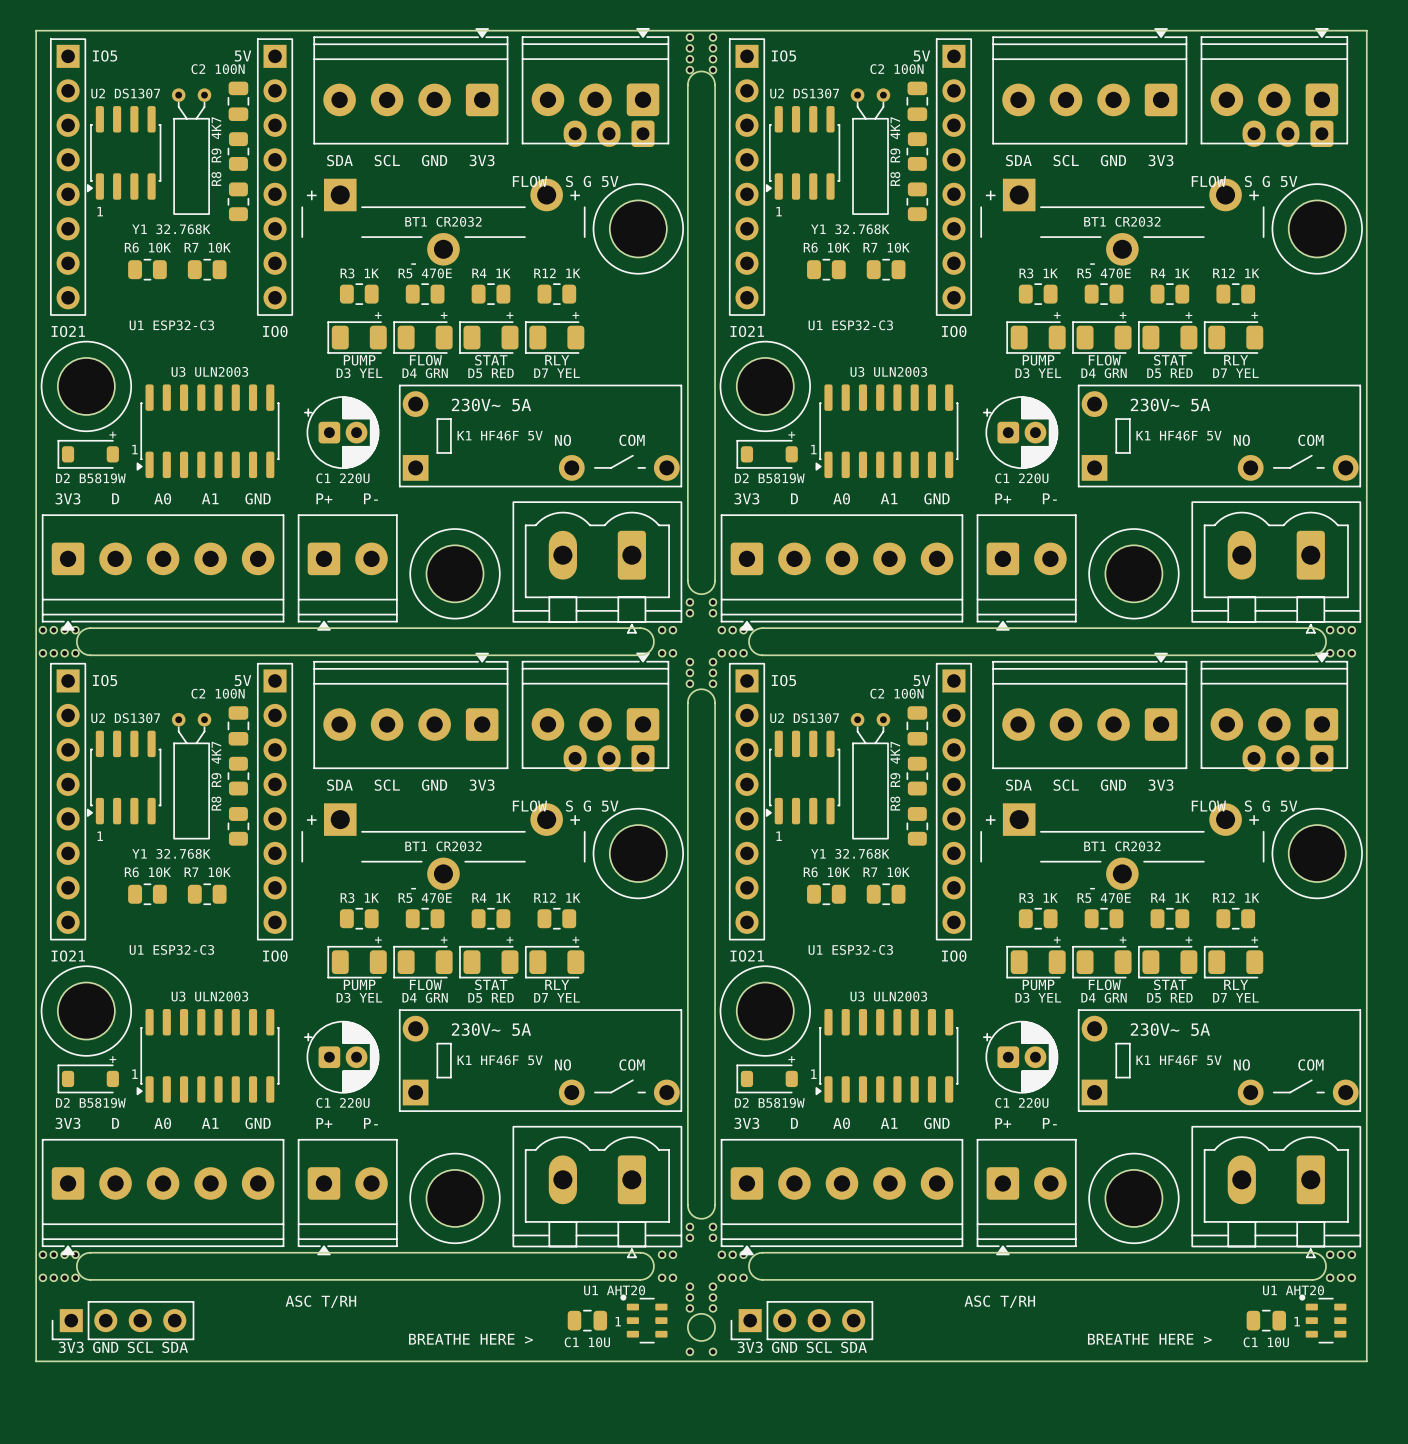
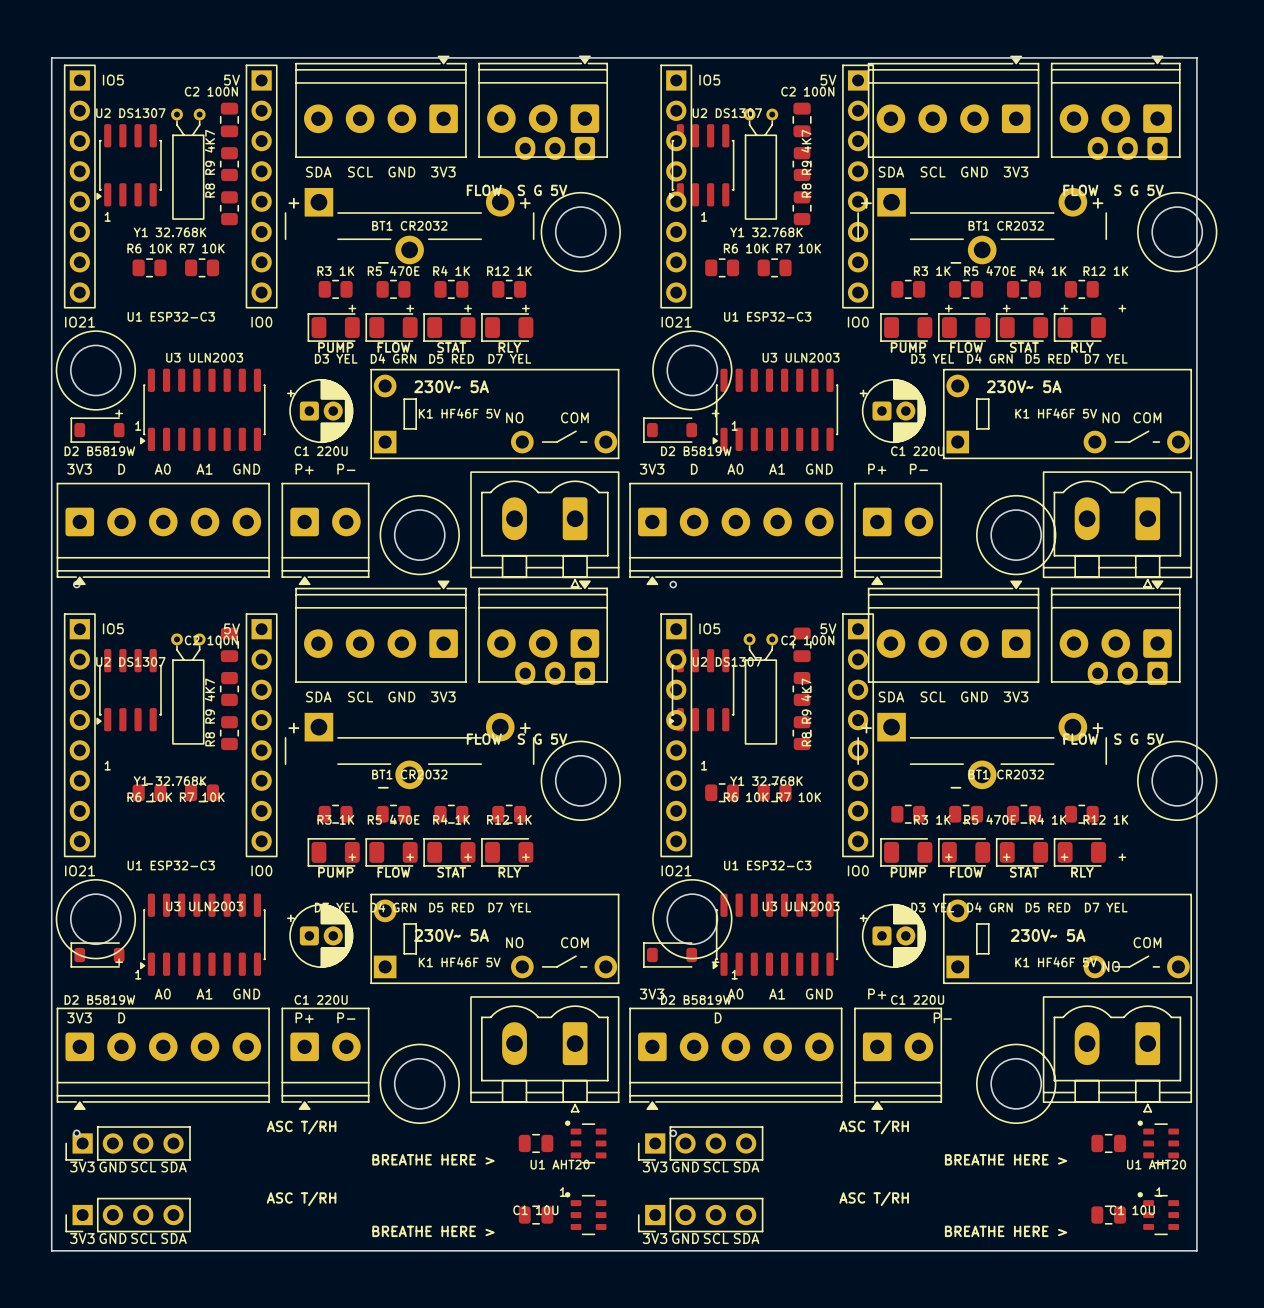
board edge: (1339, 30) (1366, 30) (1366, 1361) (36, 1361) -> (1196, 57) (1196, 1250) (51, 1250) (51, 1226)
part: (689, 37) -> none
part: (713, 37) -> none
part: (689, 48) -> none
part: (713, 48) -> none
part: (689, 59) -> none
part: (713, 59) -> none
part: (689, 70) -> none
part: (713, 70) -> none
board edge: (687, 85) (687, 580) (691, 590) (701, 594) (711, 590) (715, 580) (715, 85) (711, 75) (701, 71) (691, 75) (687, 85) -> none
part position: (1089, 86) -> (953, 106)
part position: (1274, 87) -> (1115, 107)
part position: (917, 101) -> (802, 119)
part position: (870, 151) -> (760, 164)
part position: (917, 151) -> (802, 164)
part position: (803, 152) -> (701, 165)
text position: SDA (1018, 160) -> SDA (891, 172)
text position: SCL (1066, 160) -> SCL (933, 172)
text position: GND (1113, 160) -> GND (974, 172)
text position: 3V3 (1161, 160) -> 3V3 (1015, 172)
part position: (917, 201) -> (802, 208)
part position: (1122, 222) -> (982, 226)
part: none -> (722, 267)
part: (826, 269) -> none
part: none -> (774, 267)
part: (886, 269) -> none
part: none -> (908, 289)
part: (1038, 294) -> none
part: none -> (966, 289)
part: (1104, 294) -> none
part: none -> (1023, 289)
part: (1169, 294) -> none
part: none -> (1081, 289)
part: (1235, 294) -> none
part: none -> (906, 327)
part: (1036, 337) -> none
part: none -> (964, 327)
part: (1101, 337) -> none
part: none -> (1022, 327)
part: (1167, 337) -> none
part: none -> (1079, 327)
part: (1233, 337) -> none
text position: PUMP (1038, 360) -> PUMP (908, 347)
text position: FLOW (1104, 360) -> FLOW (966, 347)
text position: STAT (1170, 360) -> STAT (1024, 347)
text position: RLY (1236, 360) -> RLY (1082, 347)
text position: 230V~ 5A (1170, 405) -> 230V~ 5A (1024, 386)
part position: (886, 431) -> (775, 409)
part position: (1020, 432) -> (892, 411)
part position: (1219, 436) -> (1067, 414)
text position: COM (1310, 440) -> COM (1147, 417)
part position: (767, 454) -> (670, 430)
text position: 3V3 (746, 498) -> 3V3 (652, 469)
text position: D (794, 498) -> D (694, 469)
text position: A0 (841, 498) -> A0 (735, 469)
text position: A1 (889, 498) -> A1 (777, 469)
text position: GND (936, 498) -> GND (819, 469)
text position: P+ (1003, 498) -> P+ (877, 469)
text position: P- (1049, 498) -> P- (918, 469)
part position: (1276, 567) -> (1117, 529)
part position: (841, 572) -> (735, 533)
part position: (1026, 572) -> (898, 533)
part: (689, 602) -> none
part: (713, 602) -> none
part: (689, 613) -> none
part: (713, 613) -> none
board edge: (90, 628) (640, 628) (649, 632) (653, 641) (649, 651) (640, 655) (90, 655) (80, 651) (76, 641) (80, 632) (90, 628) -> none
board edge: (762, 628) (1312, 628) (1322, 632) (1326, 641) (1322, 651) (1312, 655) (762, 655) (752, 651) (748, 641) (752, 632) (762, 628) -> none
part: (42, 630) -> none
part: (53, 630) -> none
part: (75, 630) -> none
part: (662, 630) -> none
part: (672, 630) -> none
part: (721, 630) -> none
part: (732, 630) -> none
part: (1330, 630) -> none
part: (1340, 630) -> none
part: (1351, 630) -> none
part: (42, 653) -> none
part: (53, 653) -> none
part: (64, 653) -> none
part: (75, 653) -> none
part: (662, 653) -> none
part: (672, 653) -> none
part: (721, 653) -> none
part: (732, 653) -> none
part: (743, 653) -> none
part: (1330, 653) -> none
part: (1340, 653) -> none
part: (1351, 653) -> none
part: (689, 662) -> none
part: (713, 662) -> none
part: (689, 672) -> none
part: (713, 672) -> none
part: (689, 683) -> none
part: (713, 683) -> none
board edge: (687, 702) (687, 1205) (691, 1214) (701, 1218) (711, 1214) (715, 1205) (715, 702) (711, 693) (701, 689) (691, 693) (687, 702) -> none
part position: (410, 710) -> (380, 631)
part position: (1089, 710) -> (953, 631)
part position: (595, 712) -> (543, 632)
part position: (1274, 712) -> (1115, 632)
part position: (238, 725) -> (229, 644)
part position: (917, 725) -> (802, 644)
part: none -> (229, 688)
part: none -> (802, 688)
part position: (191, 776) -> (188, 689)
part: (238, 776) -> none
part position: (870, 776) -> (760, 689)
part: (917, 776) -> none
part position: (124, 777) -> (129, 690)
part position: (803, 777) -> (701, 690)
text position: SDA (339, 785) -> SDA (318, 696)
text position: SCL (387, 785) -> SCL (360, 696)
text position: GND (434, 785) -> GND (401, 696)
text position: 3V3 (482, 785) -> 3V3 (443, 696)
text position: SDA (1018, 785) -> SDA (891, 696)
text position: SCL (1066, 785) -> SCL (933, 696)
text position: GND (1113, 785) -> GND (974, 696)
text position: 3V3 (1161, 785) -> 3V3 (1015, 696)
part: none -> (229, 733)
part: none -> (802, 733)
part: (238, 826) -> none
part: (917, 826) -> none
part position: (443, 846) -> (409, 751)
part position: (1122, 846) -> (982, 751)
part: none -> (202, 792)
part: none -> (722, 792)
part: none -> (774, 792)
part: none -> (908, 814)
part: none -> (966, 814)
part: none -> (1023, 814)
part: none -> (1081, 814)
part position: (147, 894) -> (149, 792)
part: (207, 894) -> none
part: (826, 894) -> none
part: (886, 894) -> none
part position: (359, 918) -> (335, 814)
part position: (425, 918) -> (393, 814)
part position: (490, 918) -> (451, 814)
part position: (556, 918) -> (509, 814)
part: (1038, 918) -> none
part: (1104, 918) -> none
part: (1169, 918) -> none
part: (1235, 918) -> none
part: none -> (906, 852)
part: none -> (964, 852)
part: none -> (1022, 852)
part: none -> (1079, 852)
part position: (357, 962) -> (333, 852)
part position: (422, 962) -> (391, 852)
part position: (488, 962) -> (449, 852)
part position: (554, 962) -> (507, 852)
part: (1036, 962) -> none
part: (1101, 962) -> none
part: (1167, 962) -> none
part: (1233, 962) -> none
text position: PUMP (359, 984) -> PUMP (335, 872)
text position: FLOW (425, 984) -> FLOW (393, 872)
text position: STAT (491, 984) -> STAT (451, 872)
text position: RLY (557, 984) -> RLY (509, 872)
text position: PUMP (1038, 984) -> PUMP (908, 872)
text position: FLOW (1104, 984) -> FLOW (966, 872)
text position: STAT (1170, 984) -> STAT (1024, 872)
text position: RLY (1236, 984) -> RLY (1082, 872)
part position: (208, 1055) -> (202, 934)
part position: (886, 1055) -> (775, 934)
part position: (341, 1057) -> (320, 935)
part position: (1020, 1057) -> (892, 935)
part position: (540, 1060) -> (494, 938)
part position: (1219, 1060) -> (1067, 938)
text position: NO (562, 1064) -> NO (514, 942)
text position: COM (632, 1064) -> COM (574, 942)
text position: COM (1310, 1064) -> COM (1147, 942)
part position: (88, 1078) -> (97, 954)
part position: (767, 1078) -> (670, 954)
text position: A0 (162, 1123) -> A0 (162, 994)
text position: A1 (210, 1123) -> A1 (204, 994)
text position: GND (258, 1123) -> GND (246, 994)
text position: 3V3 (746, 1123) -> 3V3 (652, 994)
text position: A0 (841, 1123) -> A0 (735, 994)
text position: A1 (889, 1123) -> A1 (777, 994)
text position: GND (936, 1123) -> GND (819, 994)
text position: P+ (1003, 1123) -> P+ (877, 994)
part position: (597, 1192) -> (544, 1054)
part position: (1276, 1192) -> (1117, 1054)
part position: (163, 1197) -> (163, 1058)
part position: (347, 1197) -> (325, 1058)
part position: (841, 1197) -> (735, 1058)
part position: (1026, 1197) -> (898, 1058)
part: (689, 1226) -> none
part: (713, 1226) -> none
part: (689, 1237) -> none
part: (713, 1237) -> none
text: none -> ASC T/RH (301, 1127)
text: none -> ASC T/RH (874, 1127)
board edge: (90, 1252) (640, 1252) (649, 1256) (653, 1266) (649, 1275) (640, 1279) (90, 1279) (80, 1275) (76, 1266) (80, 1256) (90, 1252) -> none
board edge: (762, 1252) (1312, 1252) (1322, 1256) (1326, 1266) (1322, 1275) (1312, 1279) (762, 1279) (752, 1275) (748, 1266) (752, 1256) (762, 1252) -> none
part: (42, 1254) -> none
part: (53, 1254) -> none
part: (75, 1254) -> none
part: (662, 1254) -> none
part: (672, 1254) -> none
part: (721, 1254) -> none
part: (732, 1254) -> none
part: (1330, 1254) -> none
part: (1340, 1254) -> none
part: (1351, 1254) -> none
part: none -> (585, 1142)
part: none -> (1158, 1142)
part: none -> (128, 1143)
part: none -> (536, 1143)
part: none -> (700, 1143)
part: none -> (1108, 1143)
part: (42, 1277) -> none
part: (53, 1277) -> none
part: (64, 1277) -> none
part: (75, 1277) -> none
part: (662, 1277) -> none
part: (672, 1277) -> none
part: (721, 1277) -> none
part: (732, 1277) -> none
part: (743, 1277) -> none
part: (1330, 1277) -> none
part: (1340, 1277) -> none
part: (1351, 1277) -> none
text: none -> BREATHE HERE > (433, 1159)
text: none -> BREATHE HERE > (1006, 1159)
part: (689, 1286) -> none
part: (713, 1286) -> none
text: none -> 3V3 (82, 1166)
text: none -> GND (112, 1166)
text: none -> SCL (143, 1166)
text: none -> SDA (173, 1166)
text: none -> 3V3 (654, 1166)
text: none -> GND (685, 1166)
text: none -> SCL (716, 1166)
text: none -> SDA (746, 1166)
part: (689, 1297) -> none
part: (713, 1297) -> none
text: ASC T/RH (320, 1301) -> none
text: ASC T/RH (999, 1301) -> none
part: (689, 1308) -> none
part: (713, 1308) -> none
round board edge: [687, 1313, 716, 1342] -> none
part: (643, 1318) -> none
part: (1322, 1318) -> none
part: (123, 1320) -> none
part: (587, 1320) -> none
part: (801, 1320) -> none
part: (1266, 1320) -> none
text: none -> ASC T/RH (301, 1198)
text: none -> ASC T/RH (874, 1198)
text: BREATHE HERE > (470, 1339) -> none
text: BREATHE HERE > (1149, 1339) -> none
part: none -> (585, 1213)
part: none -> (1158, 1213)
text: 3V3 (71, 1347) -> none
text: GND (105, 1347) -> none
part: none -> (128, 1215)
text: SCL (140, 1347) -> none
text: SDA (175, 1347) -> none
part: none -> (536, 1215)
text: 3V3 (750, 1347) -> none
part: none -> (700, 1215)
text: GND (784, 1347) -> none
text: SCL (819, 1347) -> none
text: SDA (854, 1347) -> none
part: none -> (1108, 1215)
part: (689, 1351) -> none
part: (713, 1351) -> none
text: none -> BREATHE HERE > (433, 1231)
text: none -> BREATHE HERE > (1006, 1231)
text: none -> 3V3 (82, 1238)
text: none -> GND (112, 1238)
text: none -> SCL (143, 1238)
text: none -> SDA (173, 1238)
text: none -> 3V3 (654, 1238)
text: none -> GND (685, 1238)
text: none -> SCL (716, 1238)
text: none -> SDA (746, 1238)

